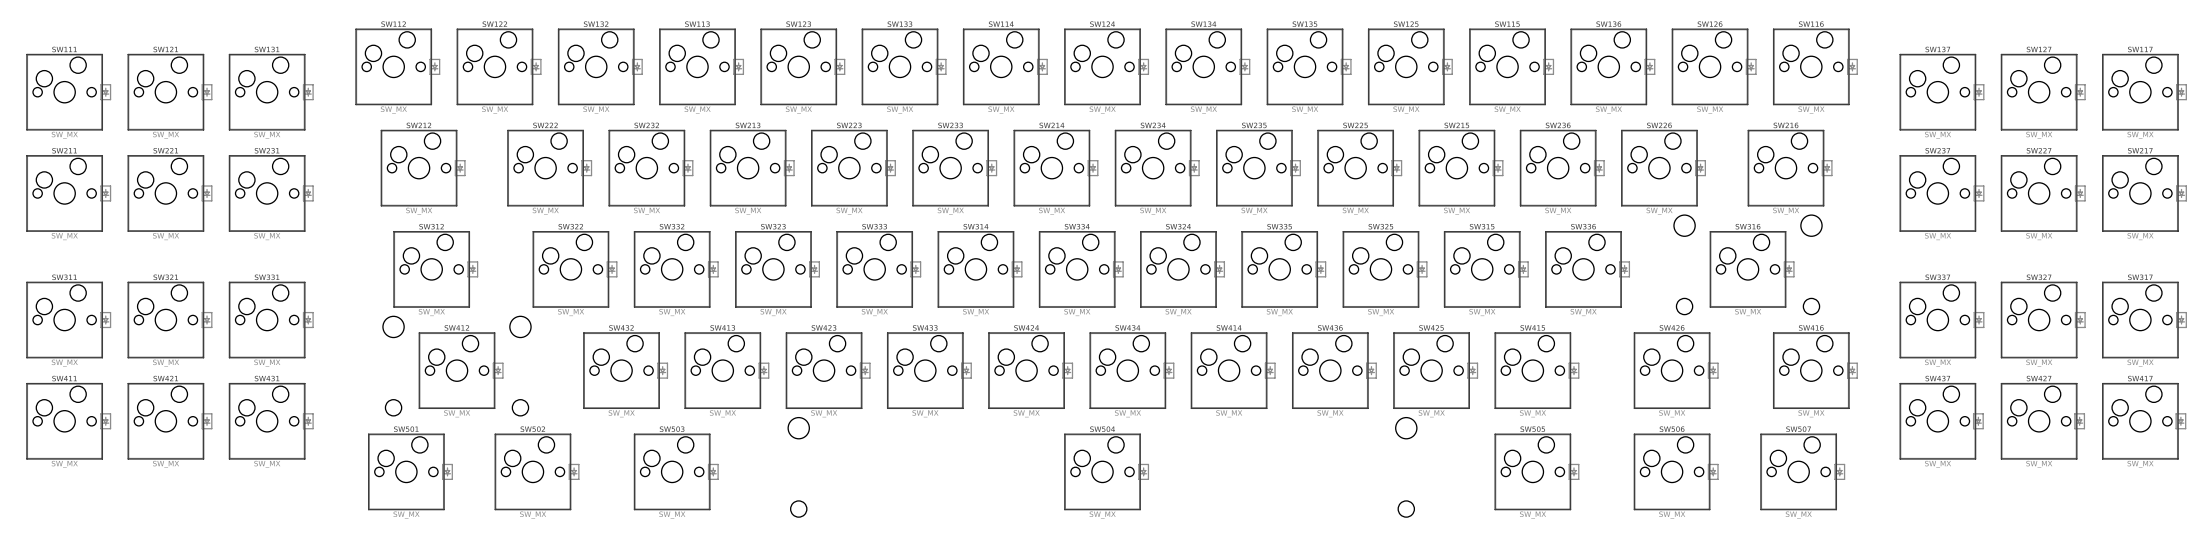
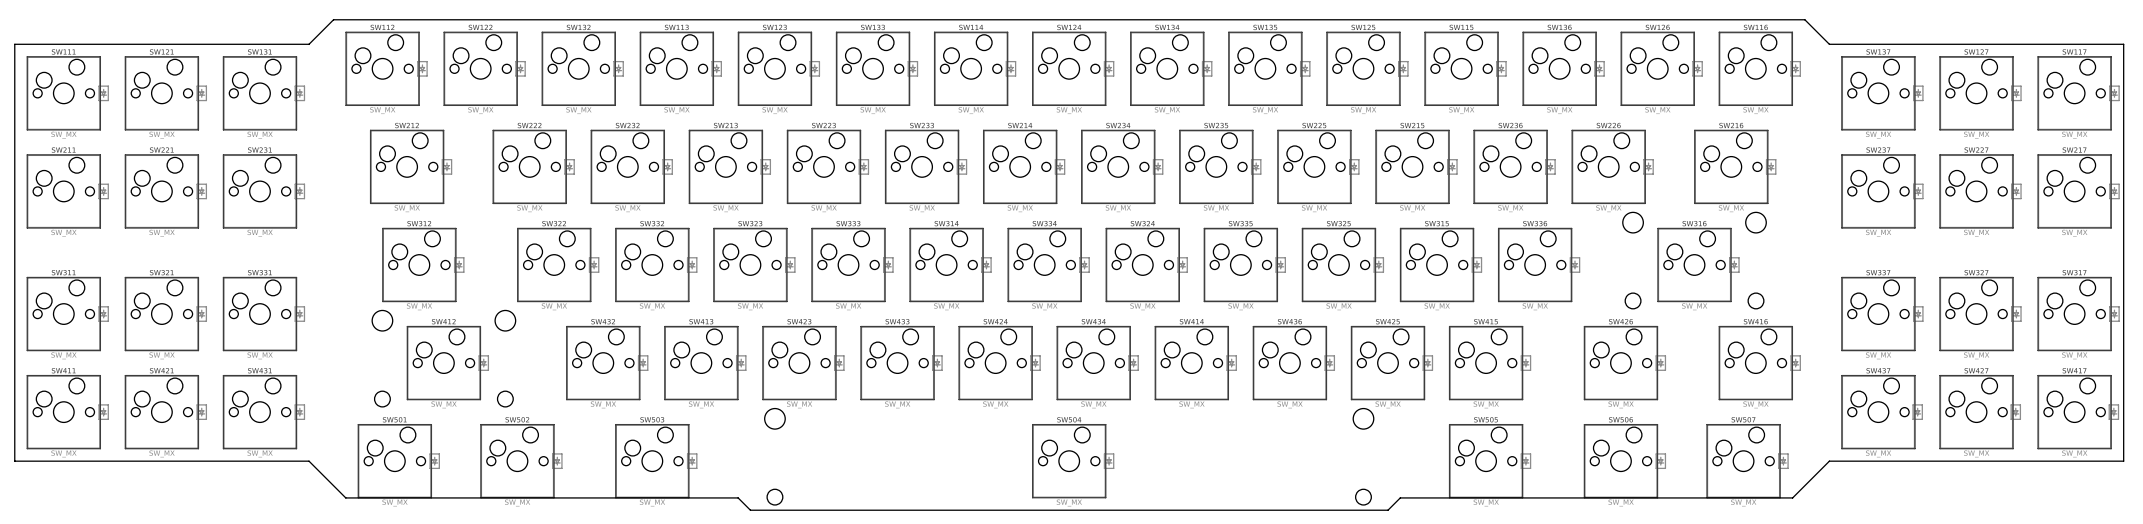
board edge: none -> (333, 19) (1804, 19) (1829, 44) (2123, 44) (2123, 461) (1829, 461) (1792, 497) (1400, 497) (1388, 510) (750, 510) (738, 497) (345, 497) (309, 461) (14, 461) (14, 44) (309, 44) (333, 19)

